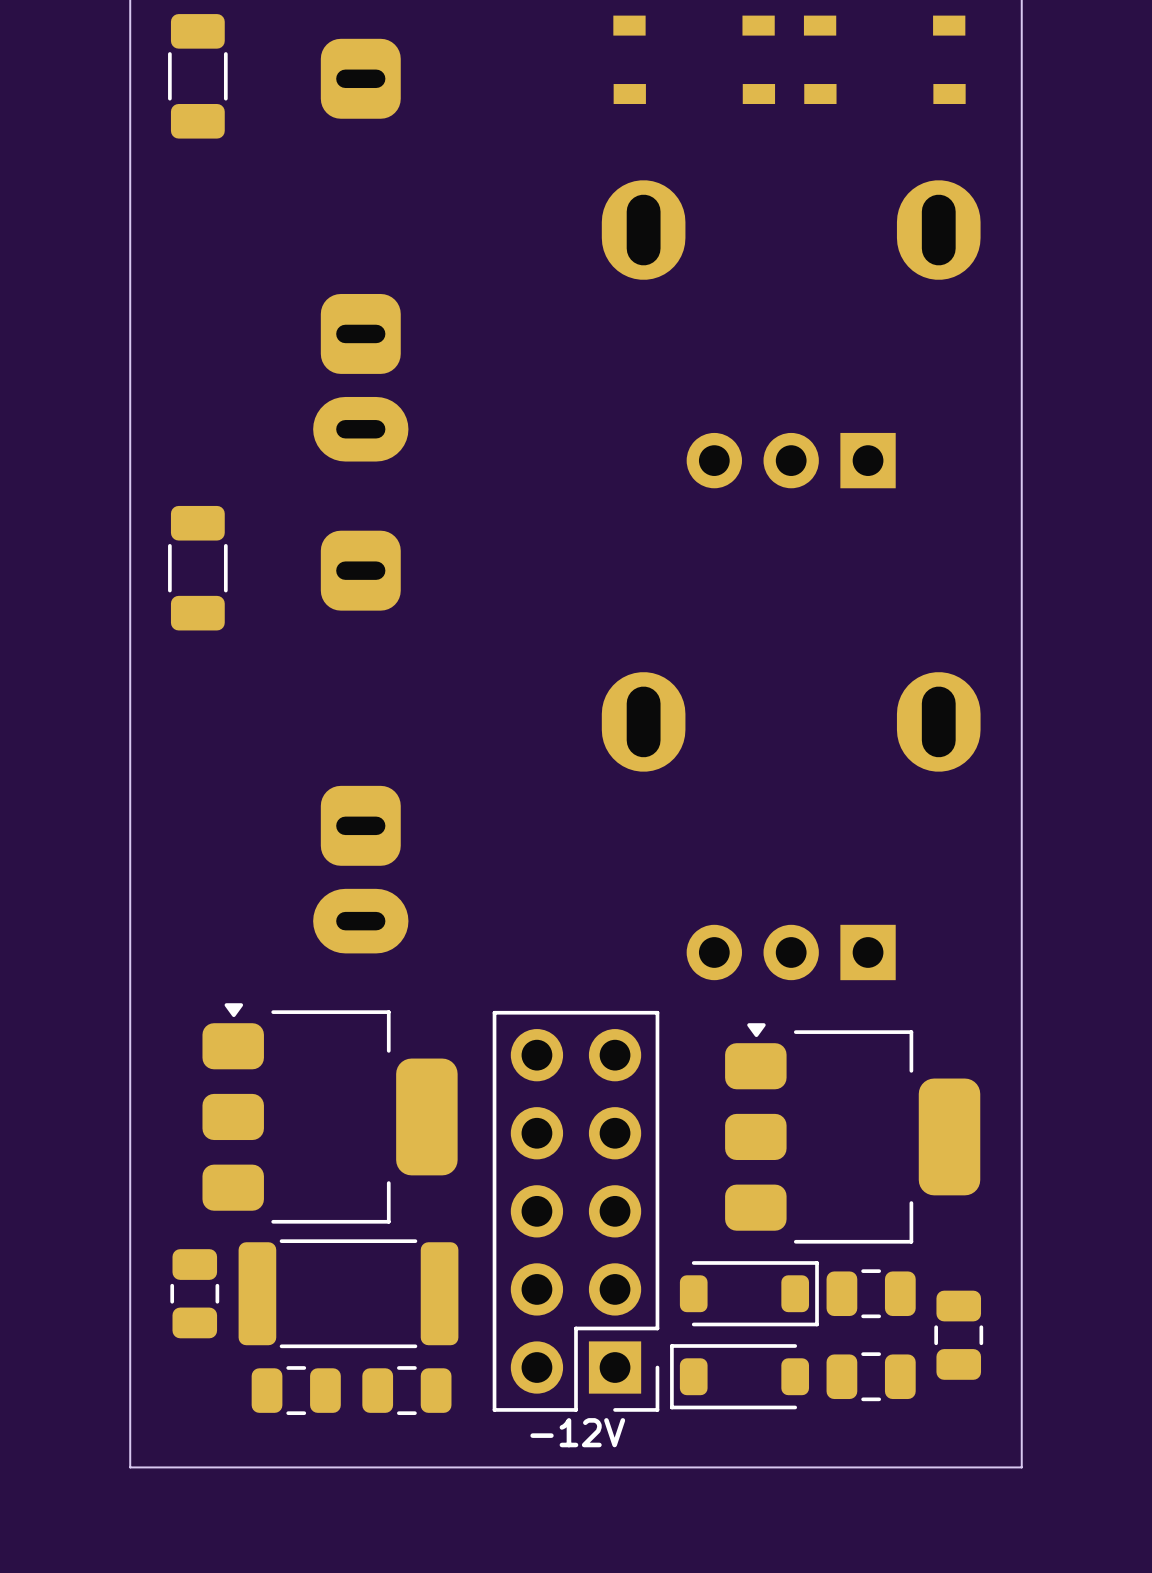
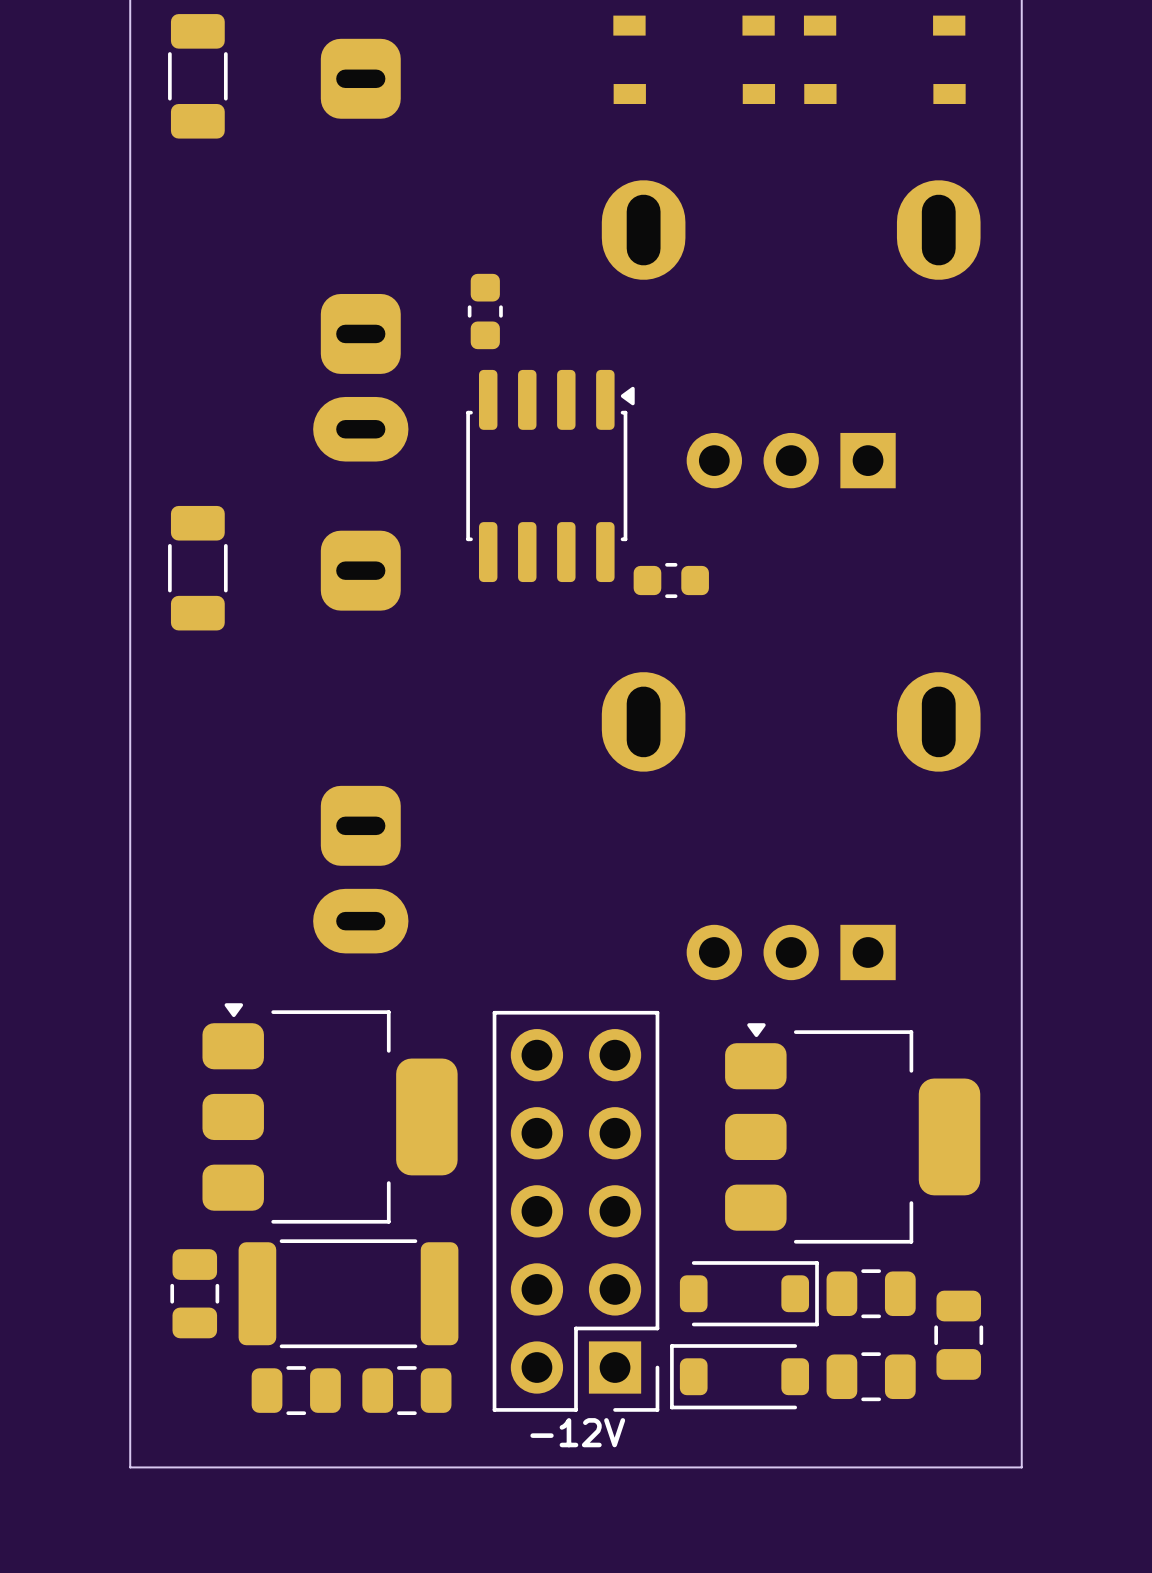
part: none -> (485, 311)
part: none -> (550, 475)
part: none -> (671, 580)

